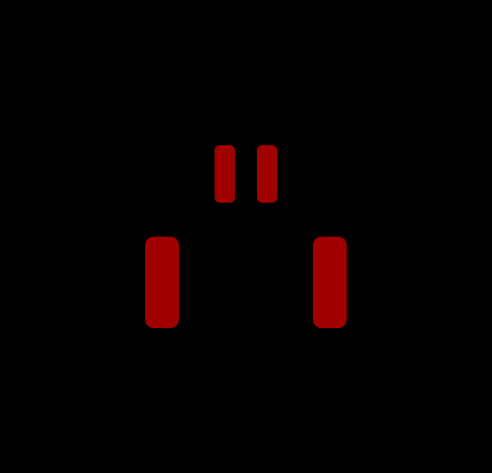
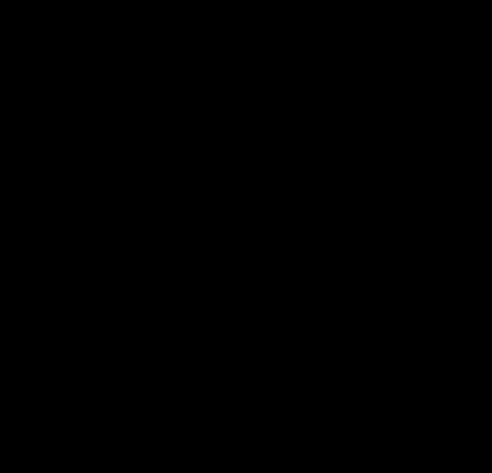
part: (245, 236) -> none

